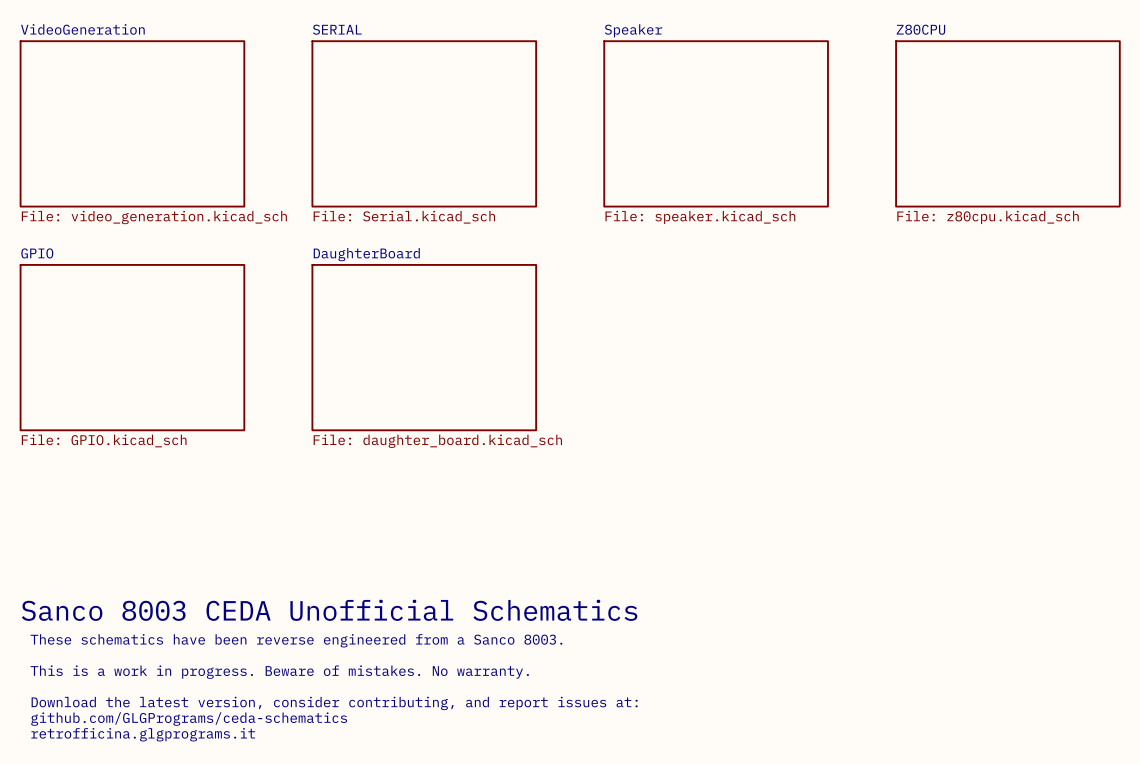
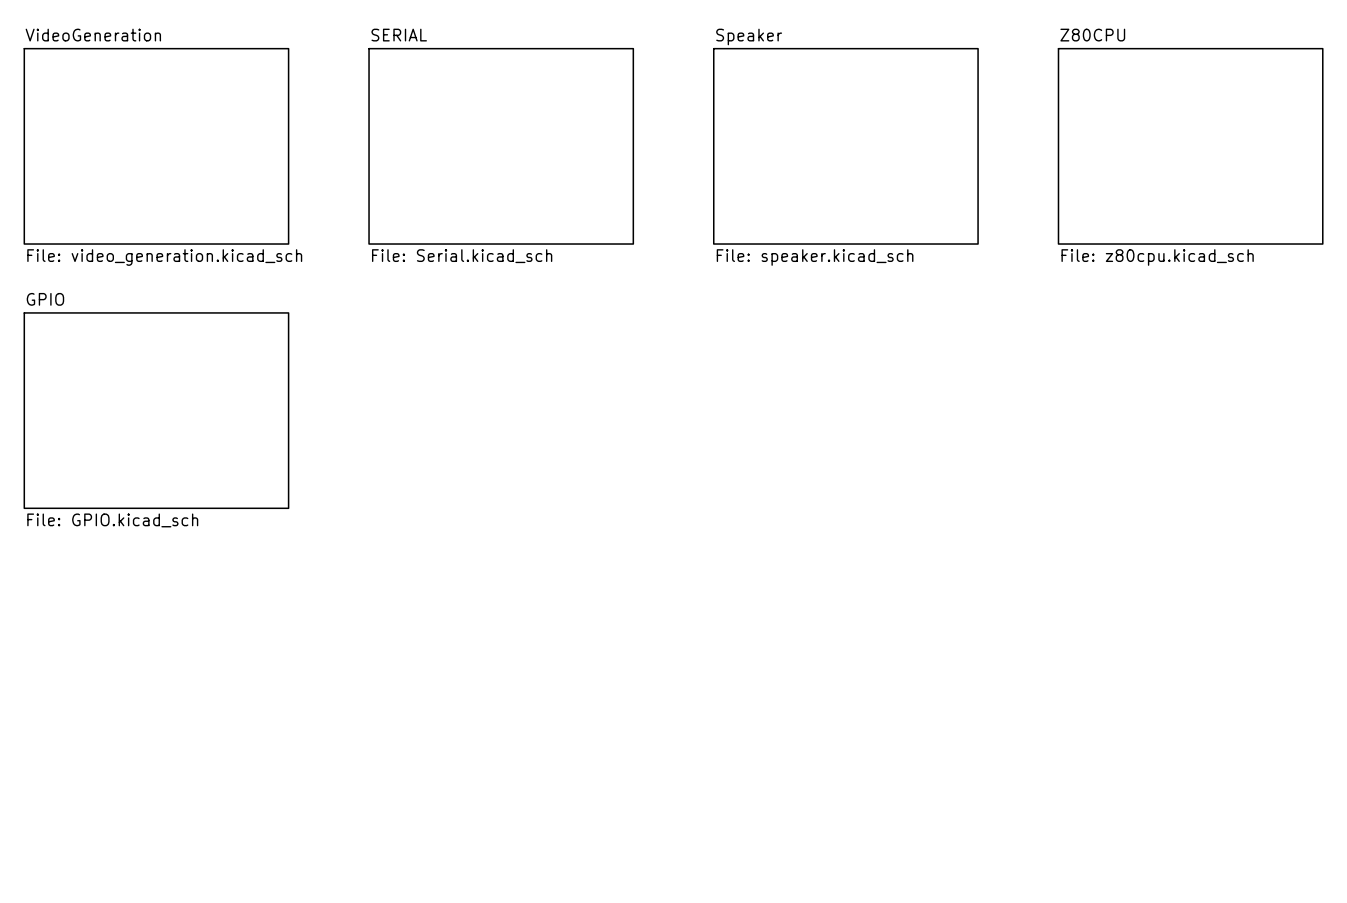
sheet DaughterBoard: File: daughter_board.kicad_sch (424, 347) -> none
text: Sanco 8003 CEDA Unofficial Schematics (329, 610) -> none
text: These schematics have been reverse engineered from a Sanco 8003. (296, 640) -> none
text: This is a work in progress. Beware of mistakes. No warranty. (279, 672) -> none
text: Download the latest version, consider contributing, and report issues at: (334, 703) -> none
text: github.com/GLGPrograms/ceda-schematics (189, 719) -> none
text: retrofficina.glgprograms.it (143, 734) -> none

